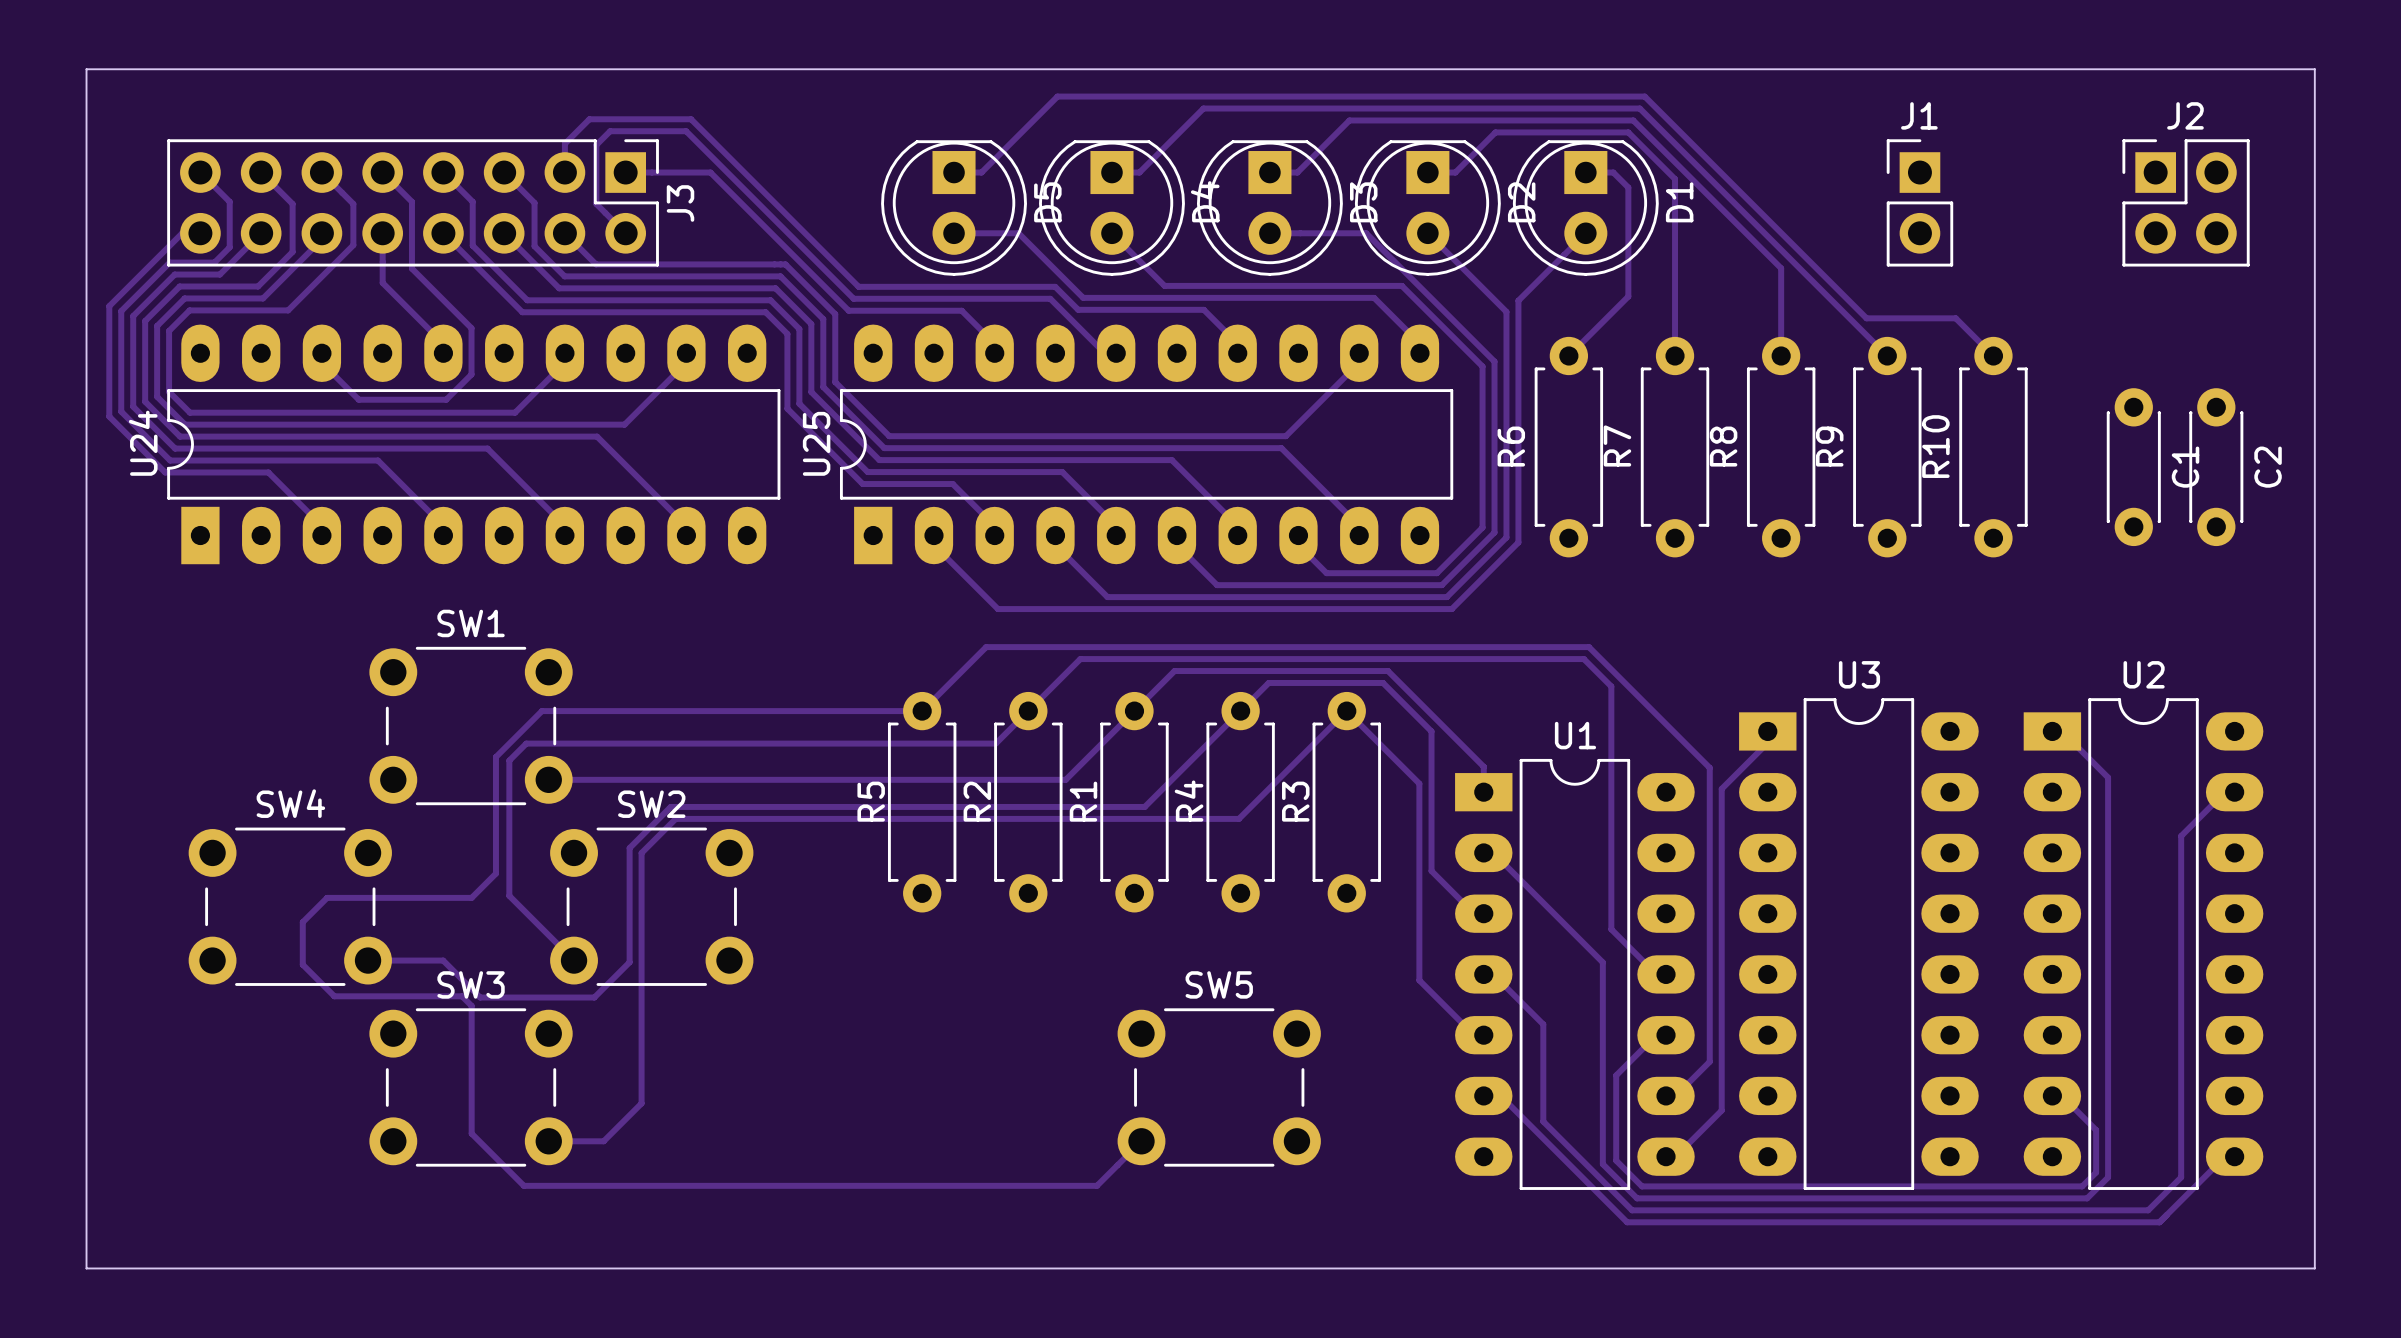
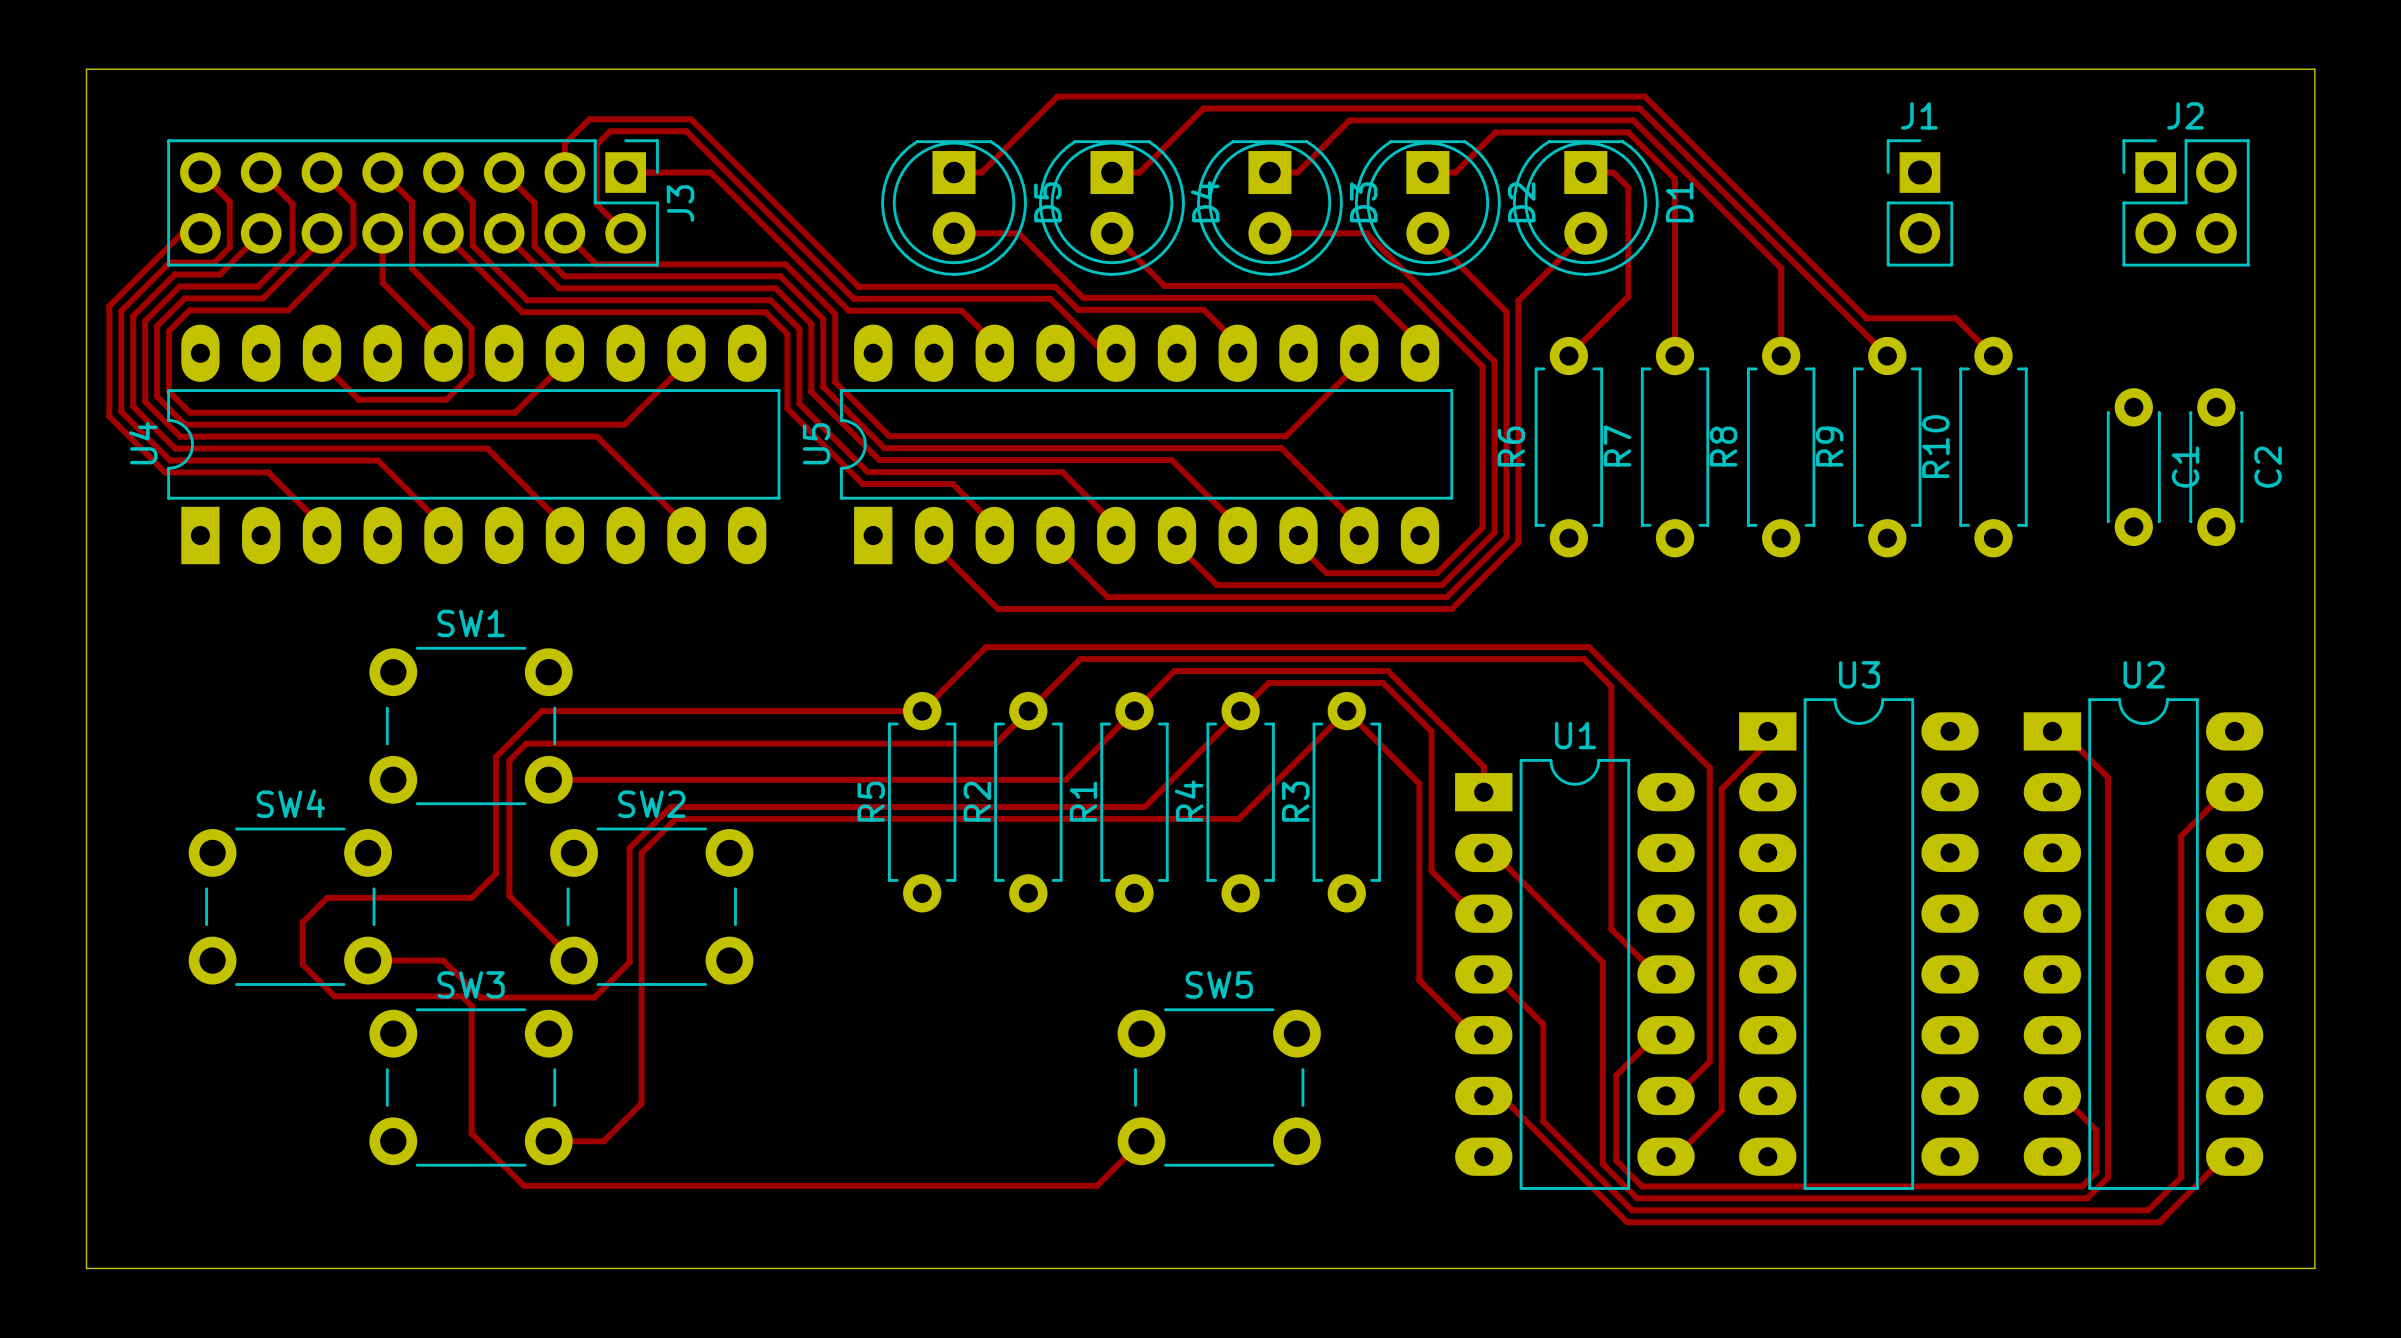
U24 name: U24 (143, 443) -> U4 (143, 443)
U25 name: U25 (816, 443) -> U5 (816, 443)

